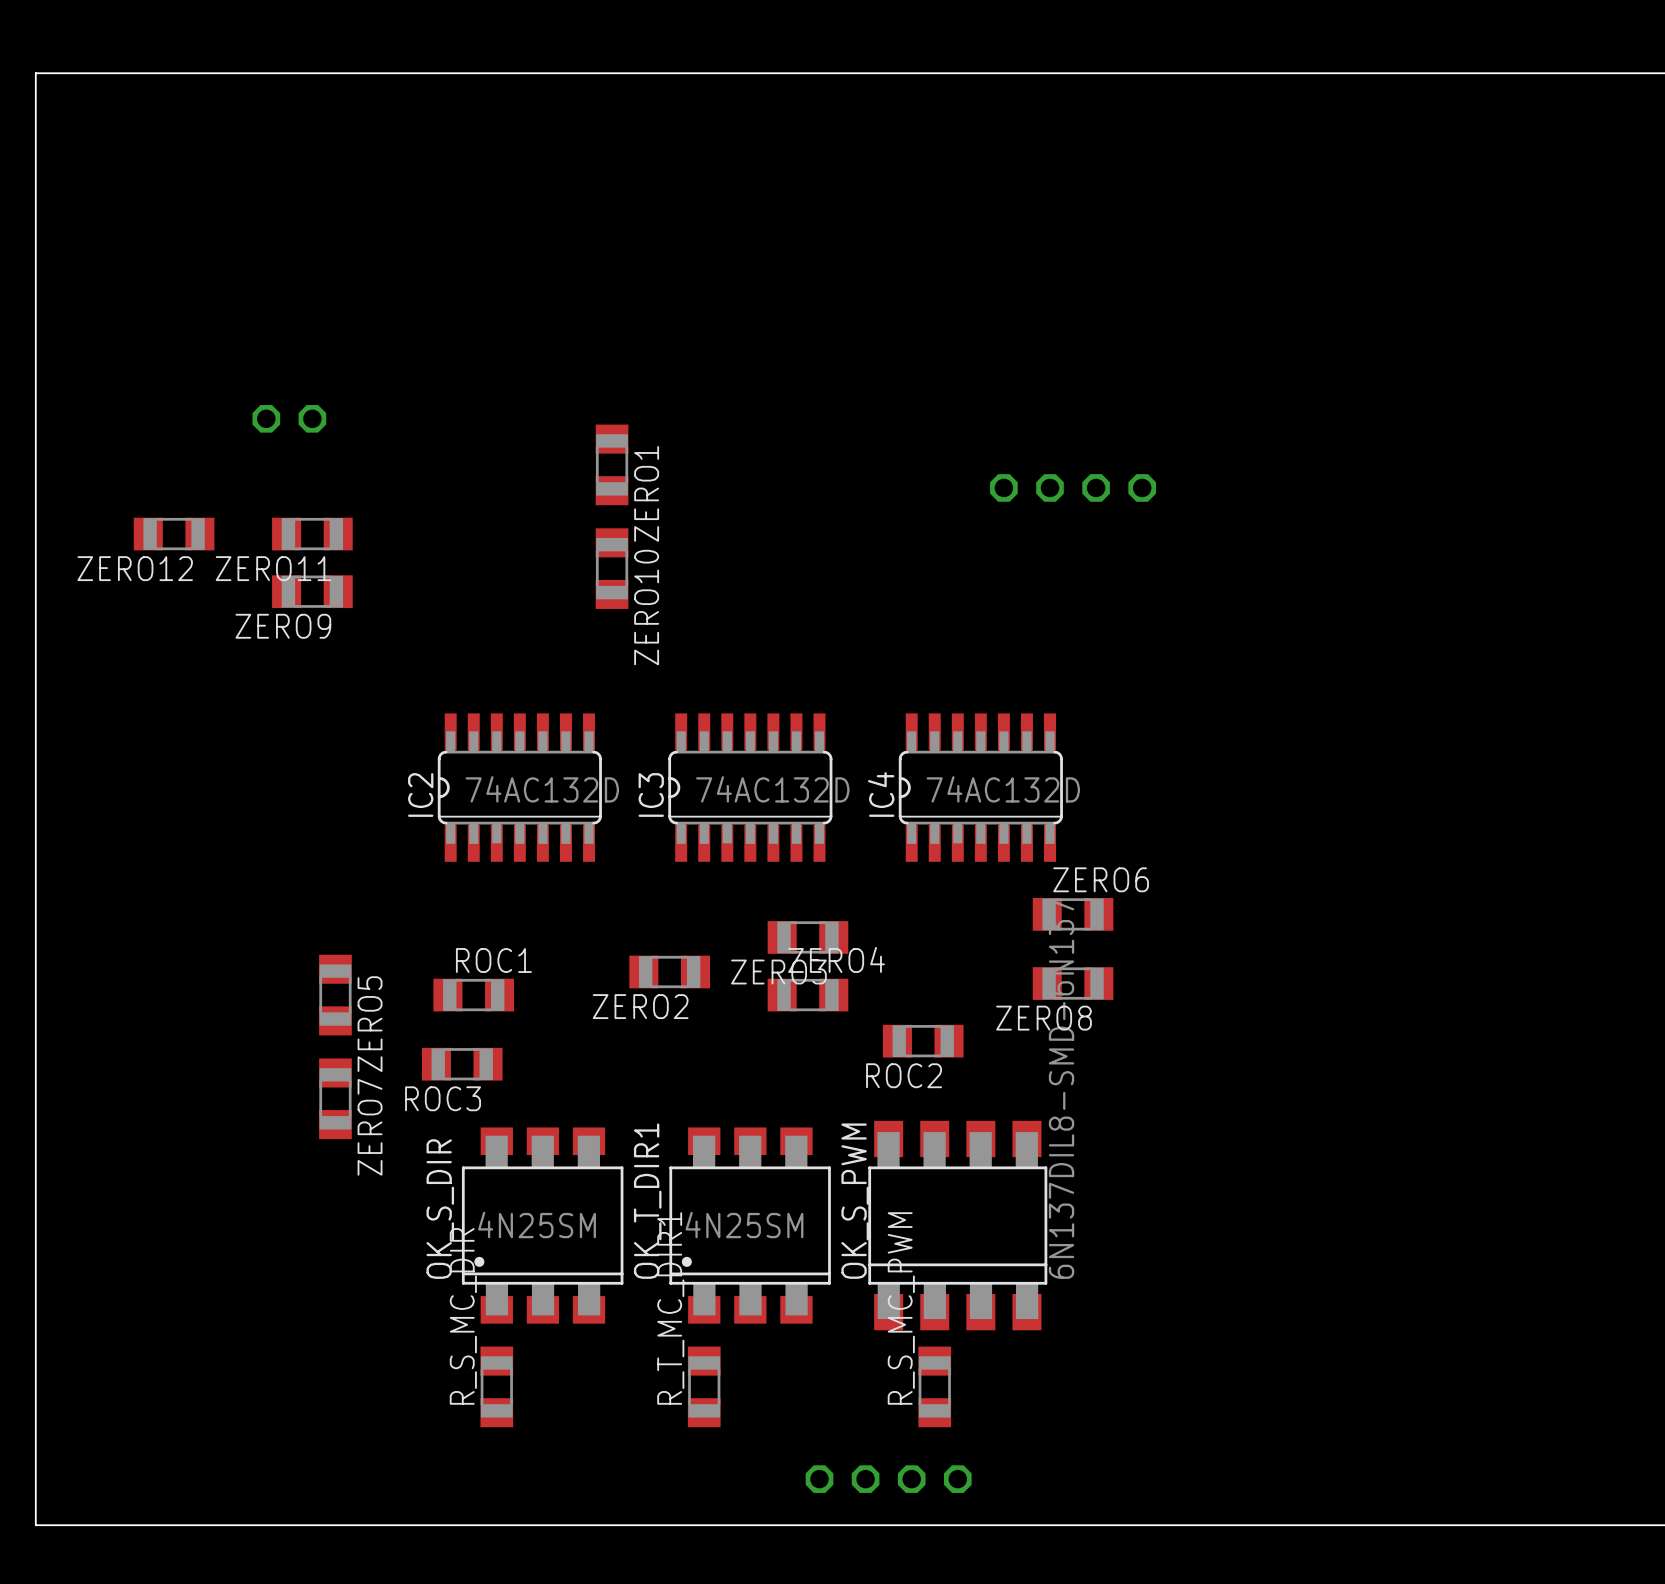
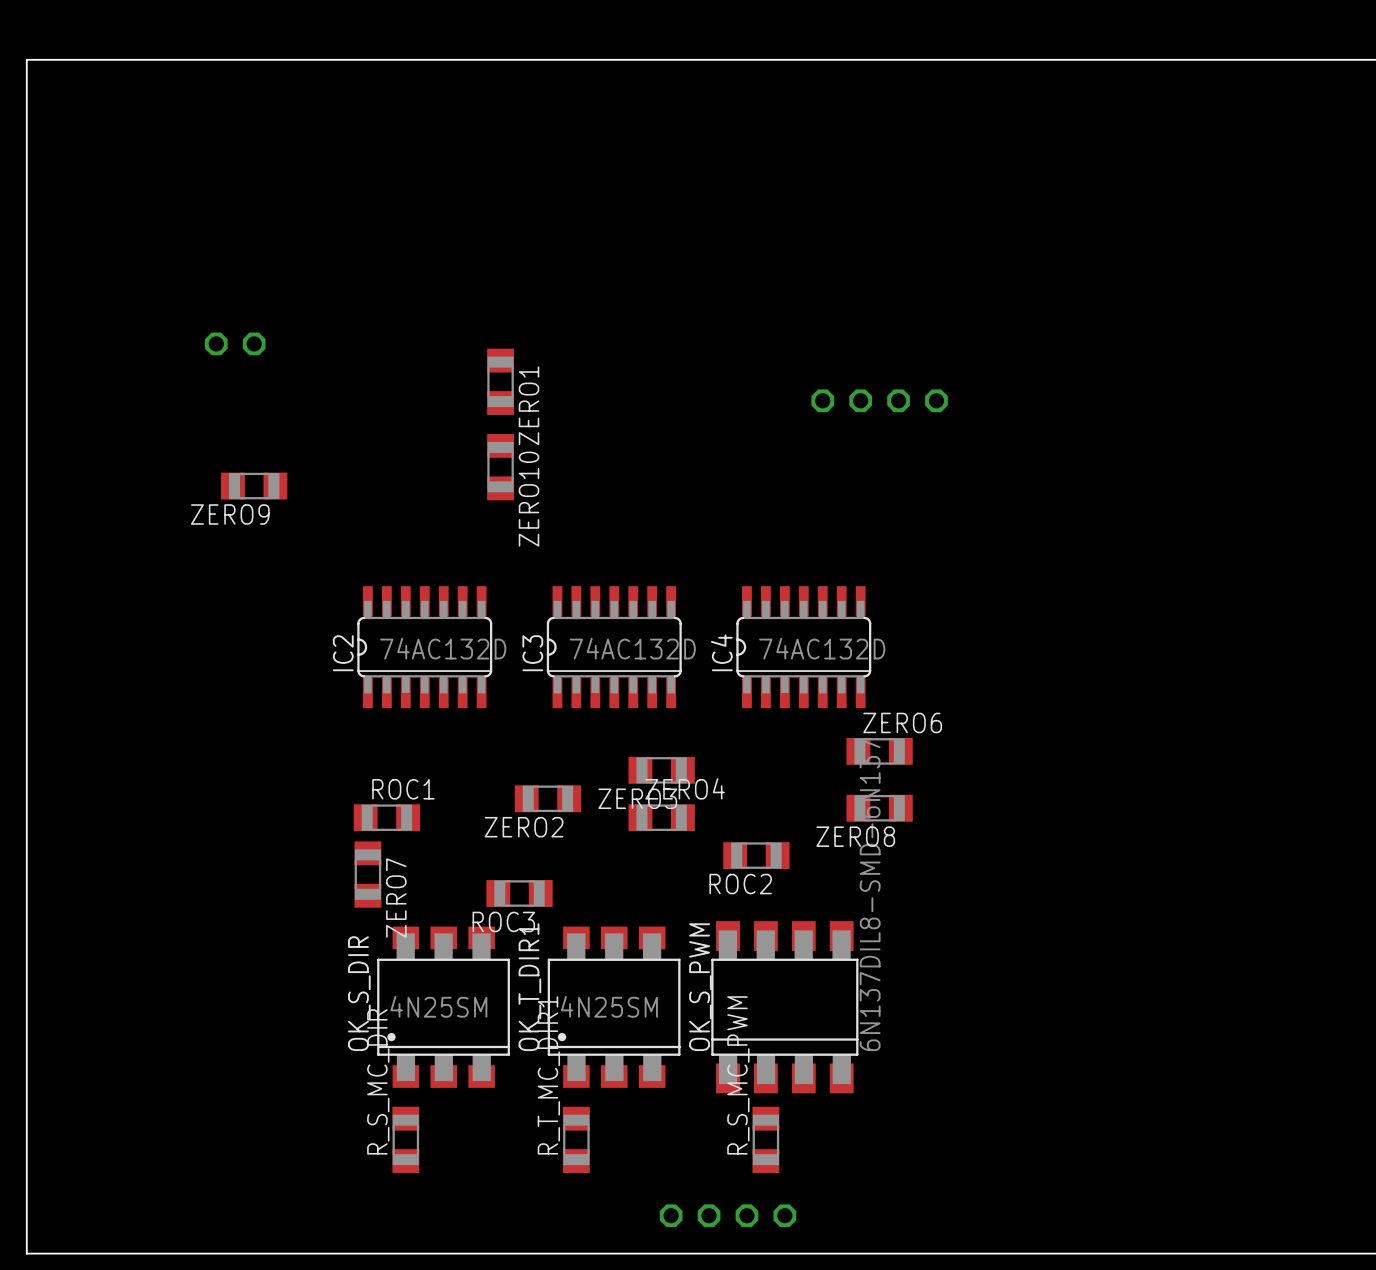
ZERO12: (174, 534) -> none
ZERO11: (312, 534) -> none
ZERO5: (335, 995) -> none
ROC3 position: (462, 1064) -> (519, 893)
ZERO7 position: (335, 1098) -> (367, 874)

